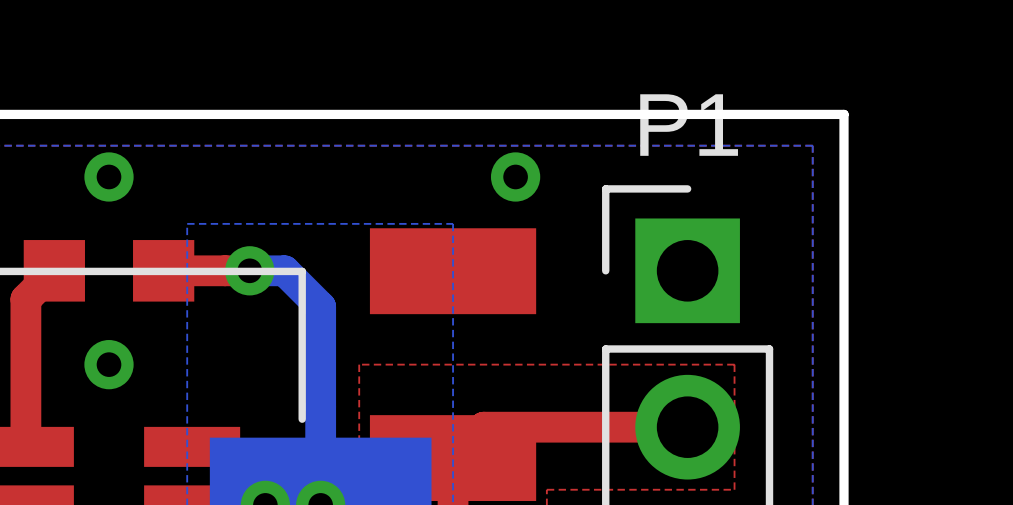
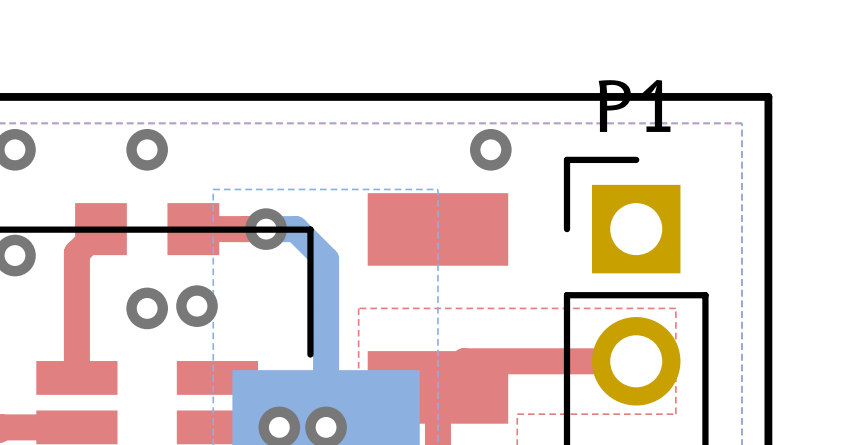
via: none -> (197, 306)

